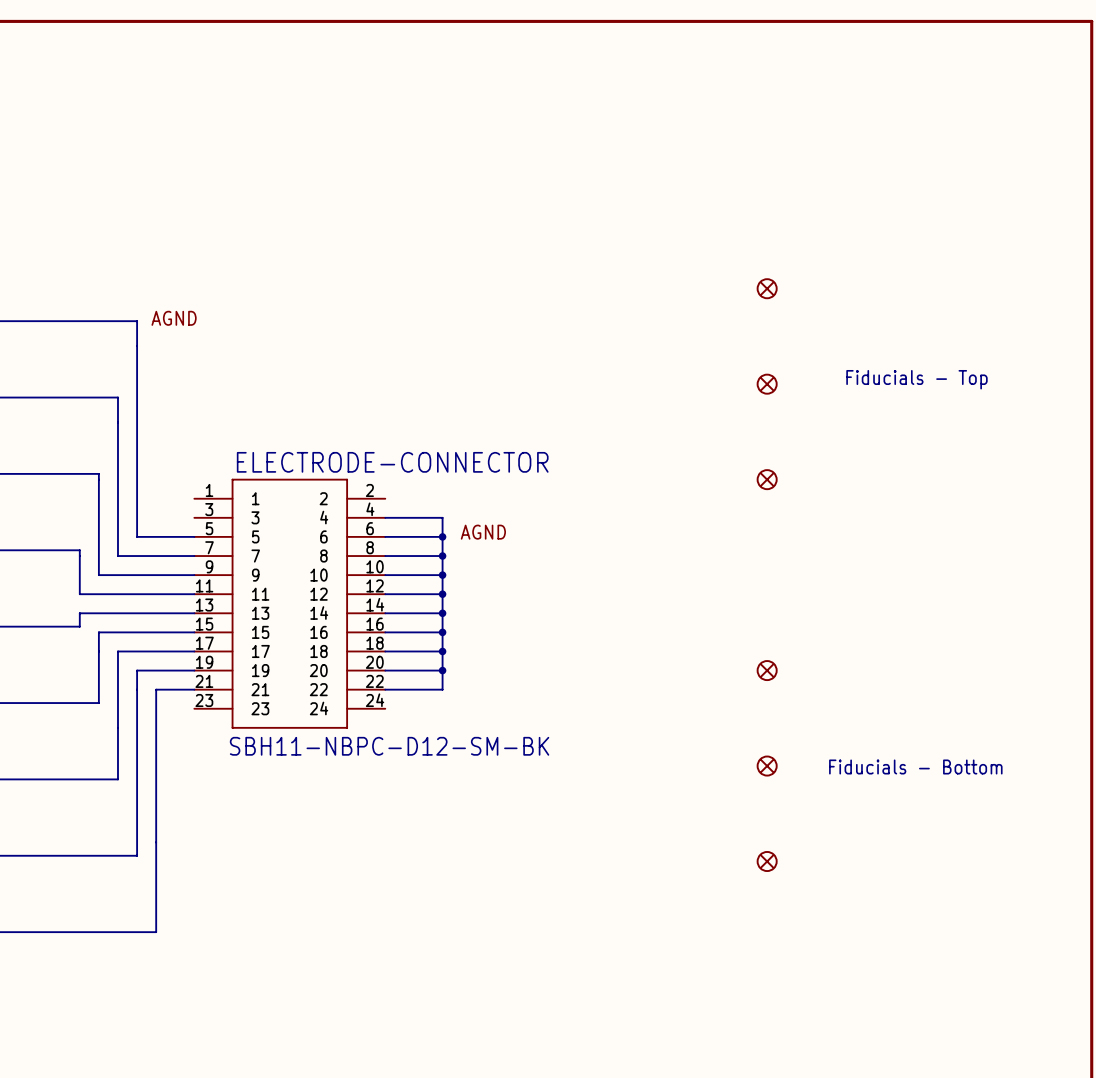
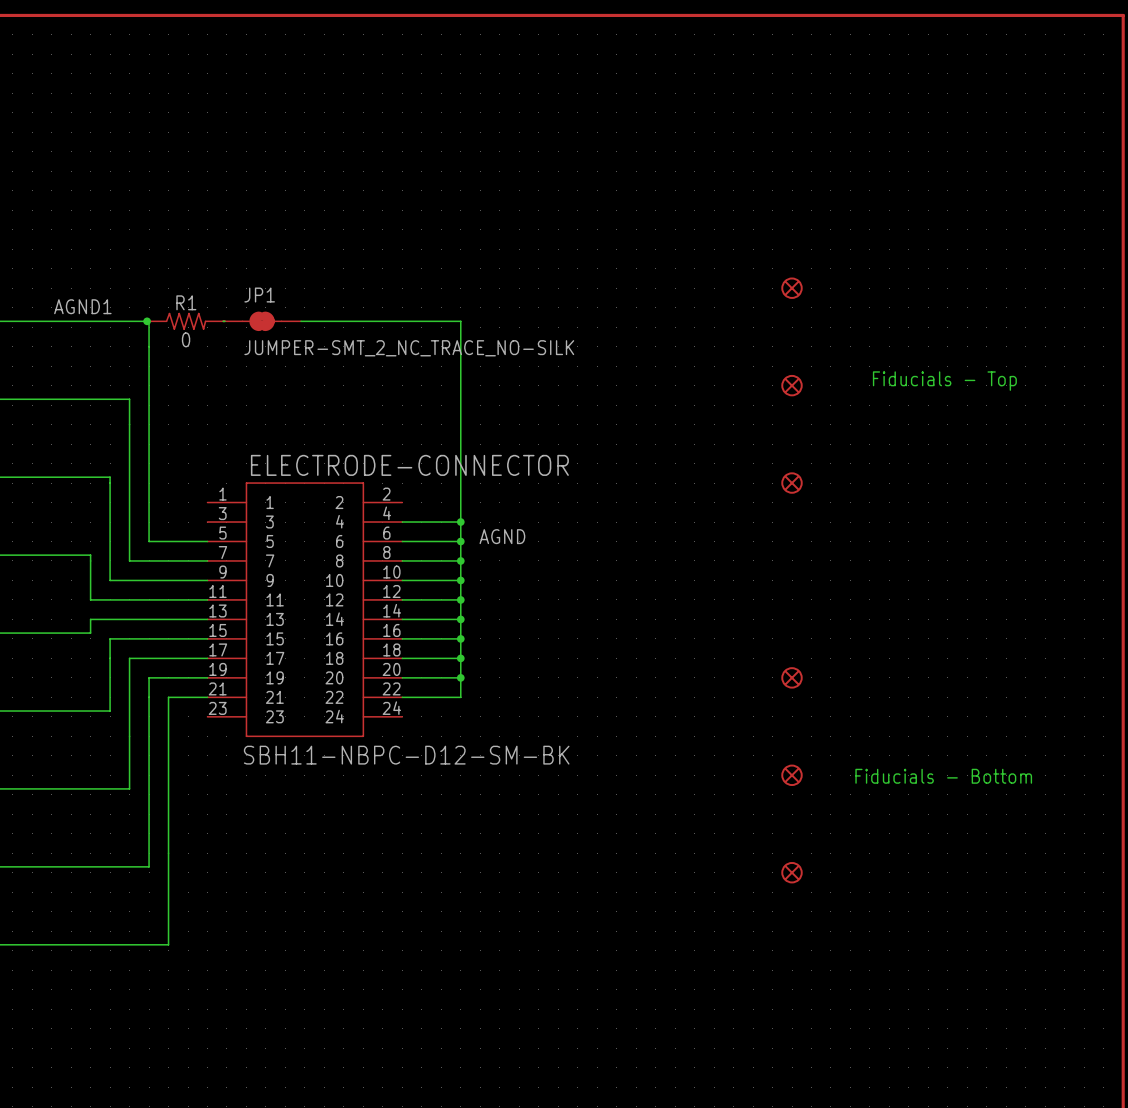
label: none -> AGND1 (82, 306)
label: AGND (174, 318) -> none
junction: none -> (147, 321)
R1: none -> 0 (186, 321)
wire: none -> (223, 321) (225, 321)
JP1: none -> JUMPER-SMT_2_NC_TRACE_NO-SILK (262, 321)
wire: none -> (301, 321) (460, 321) (460, 522)
junction: none -> (460, 522)

